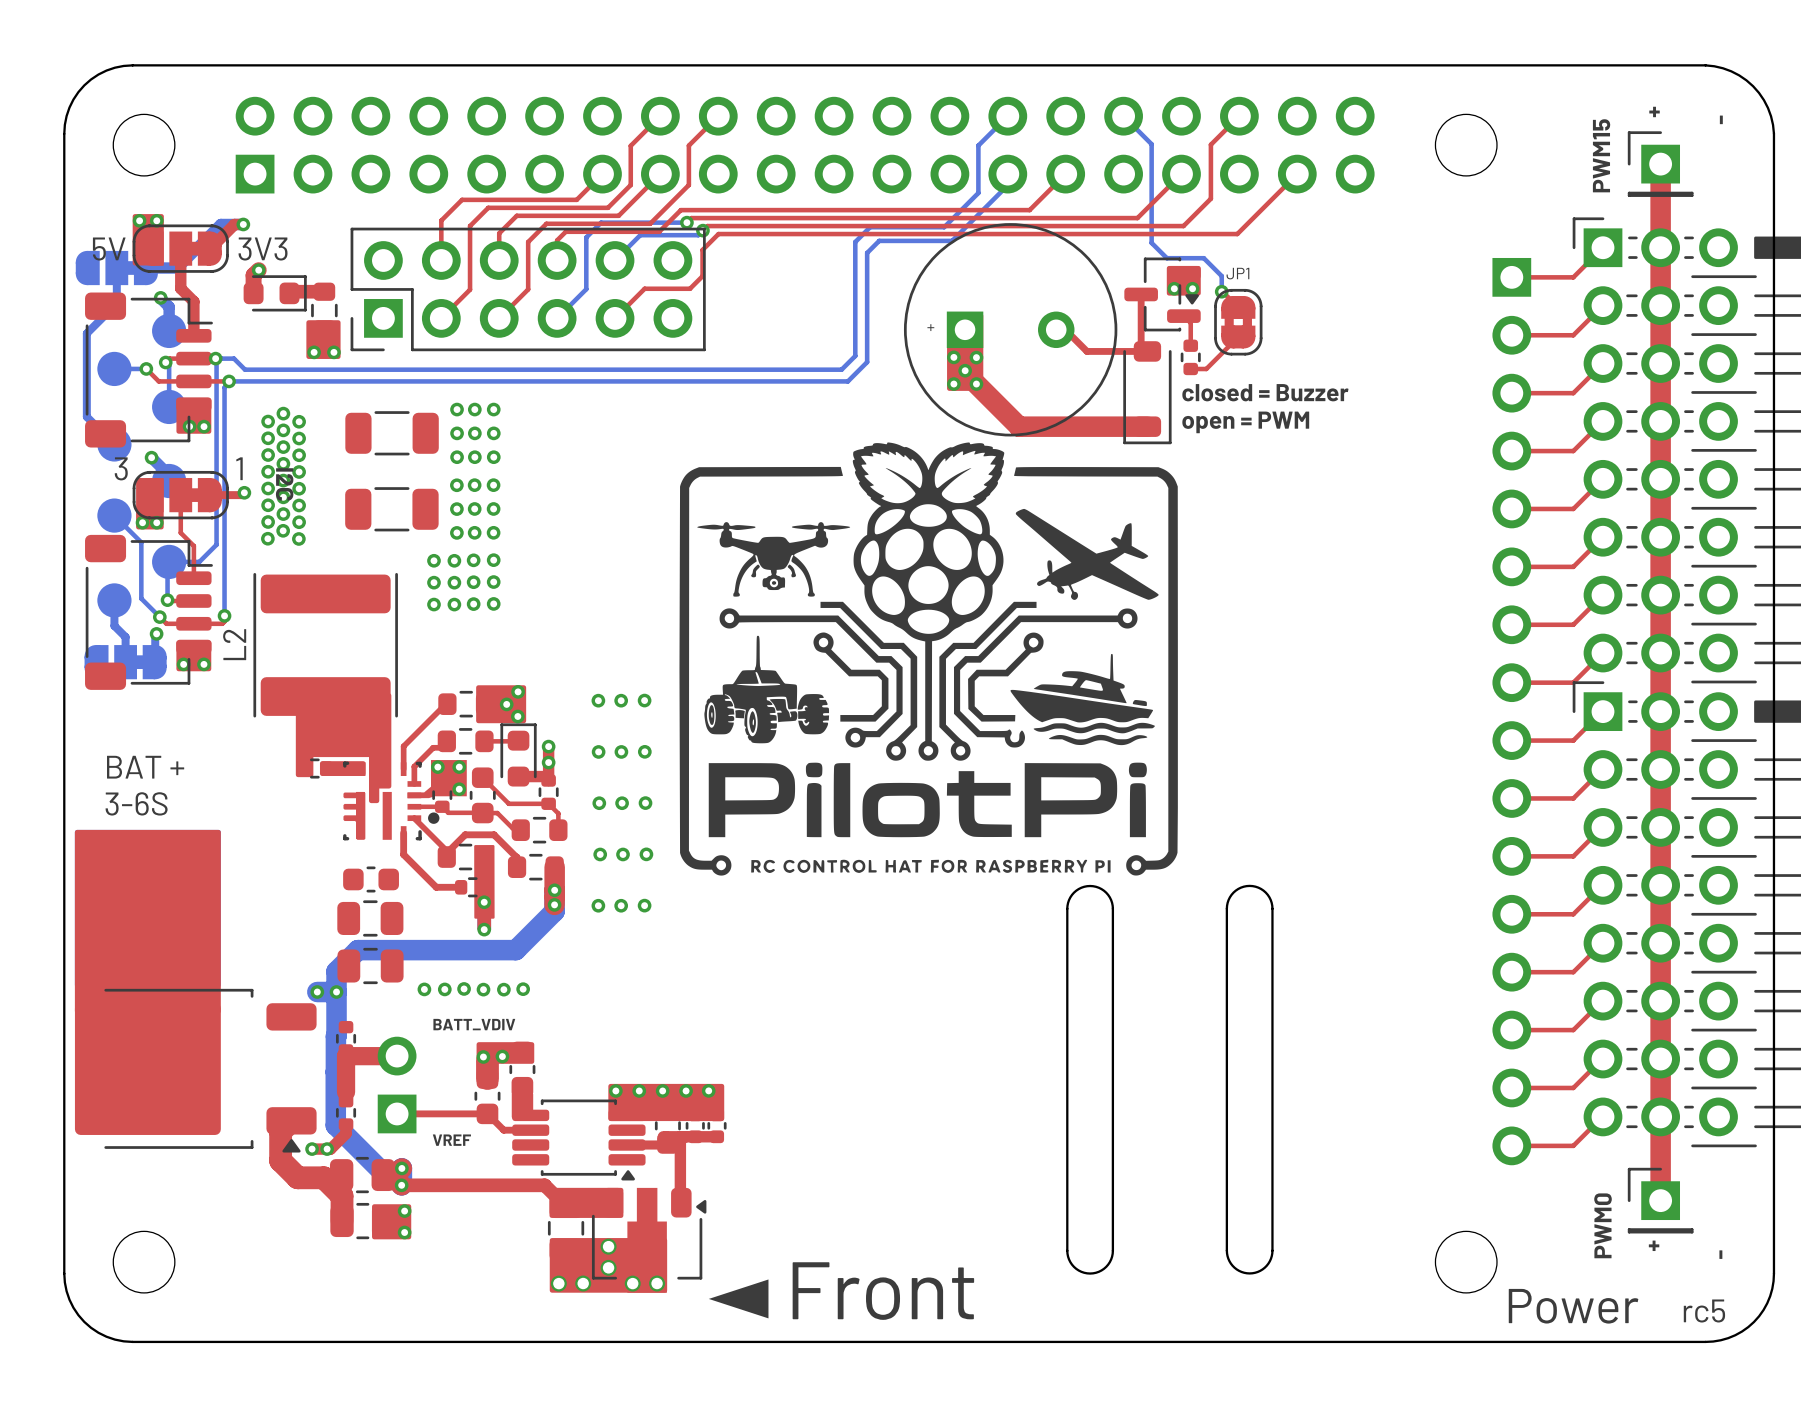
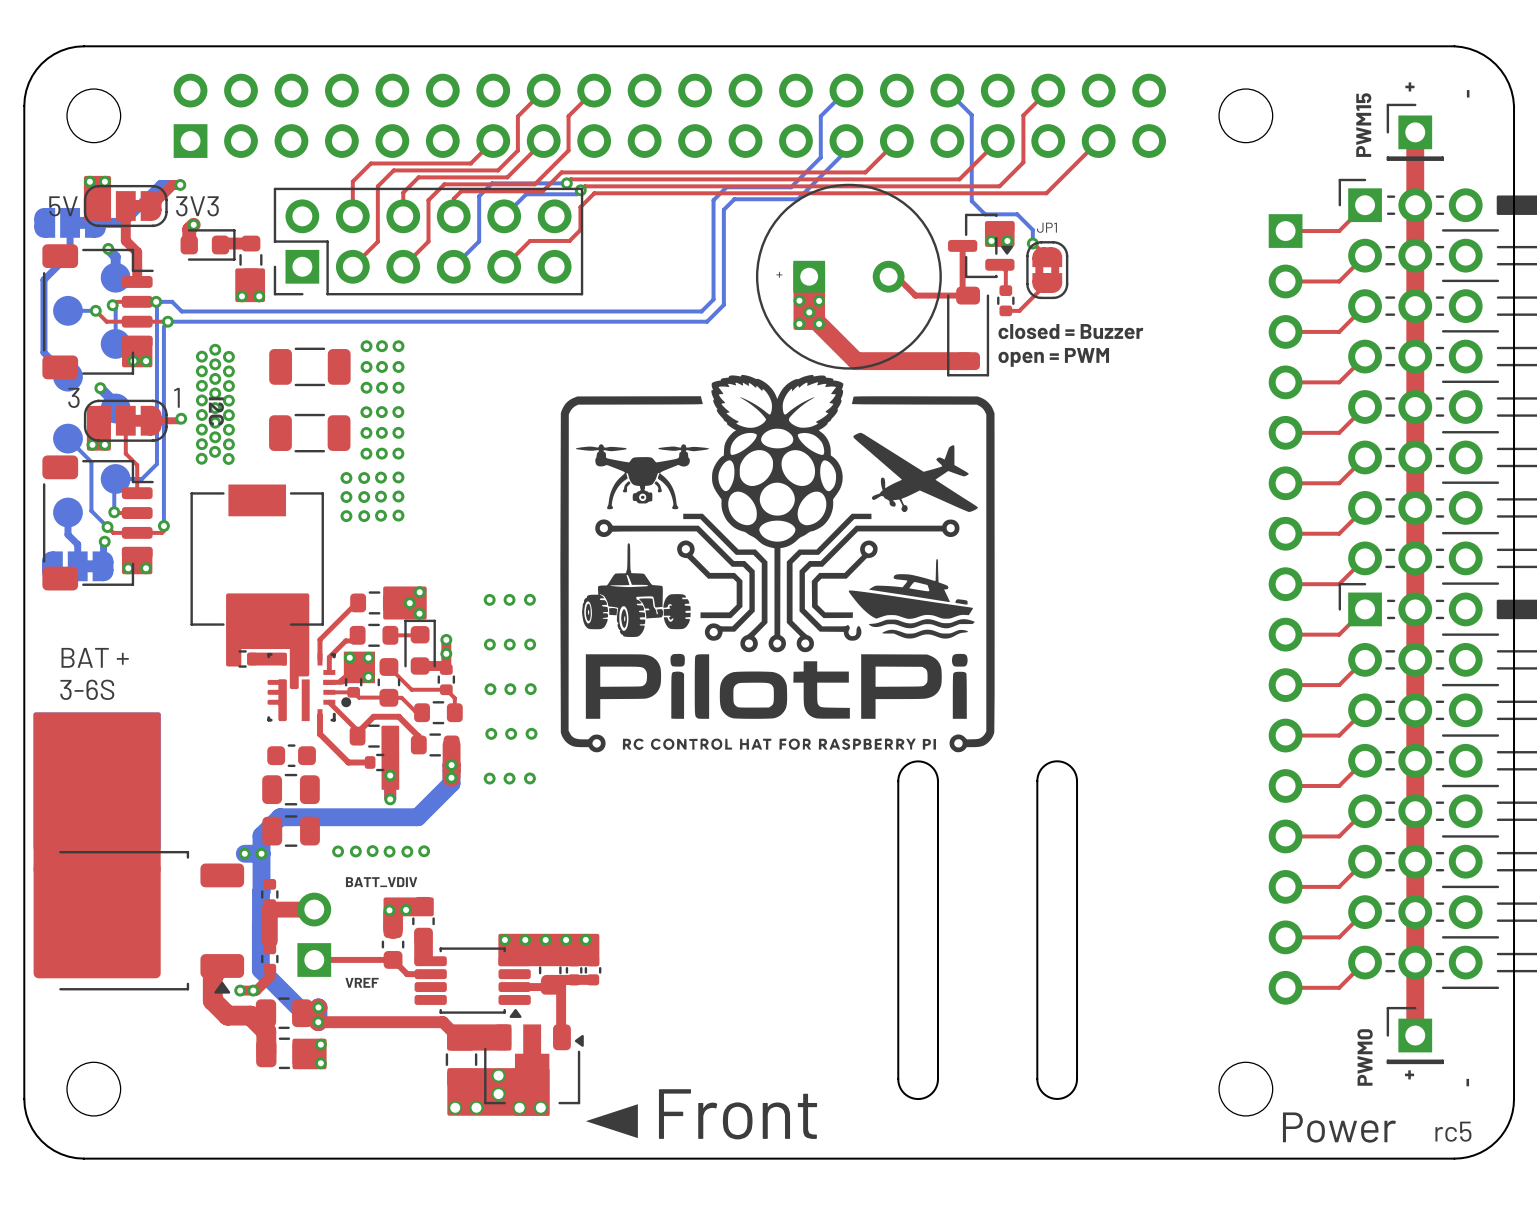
L2: (325, 645) -> none
part: none -> (257, 558)

